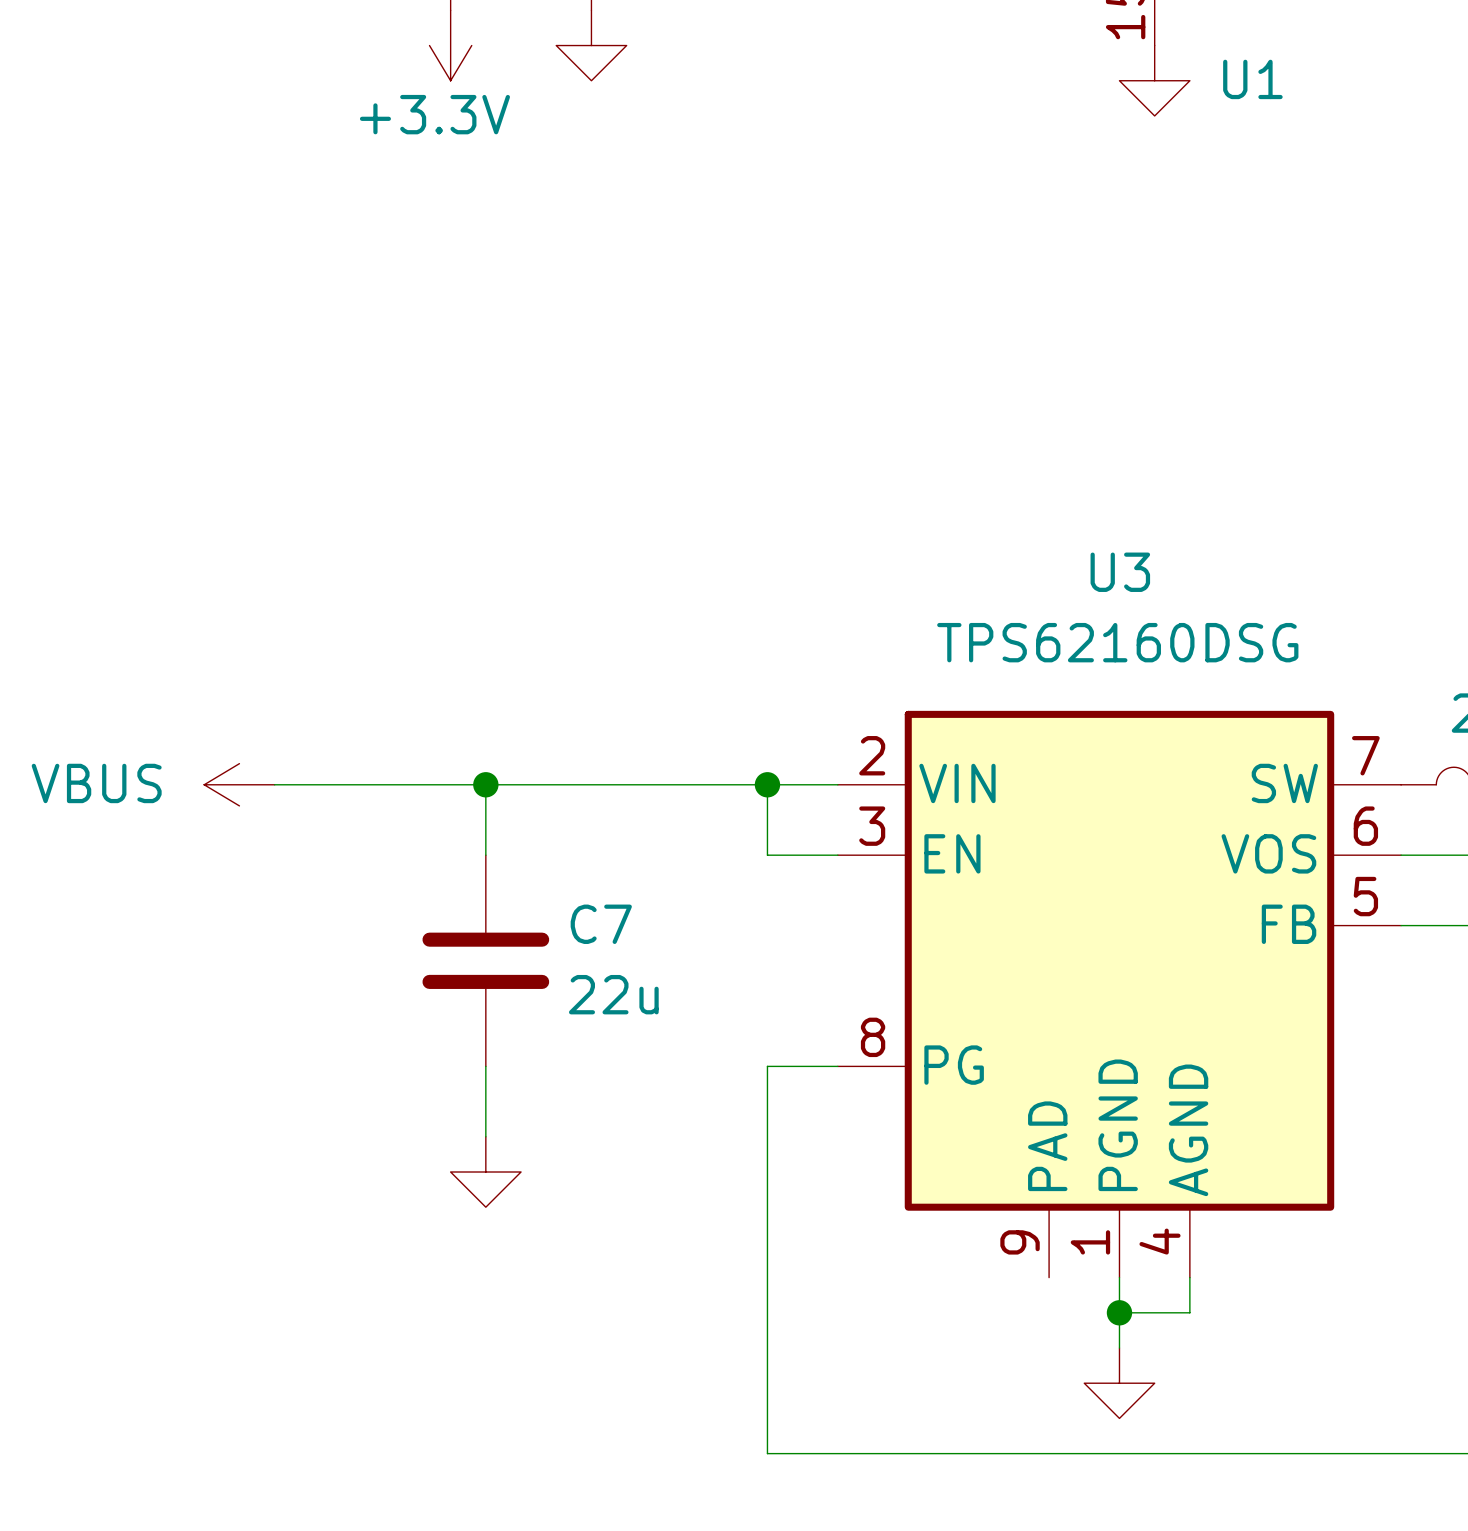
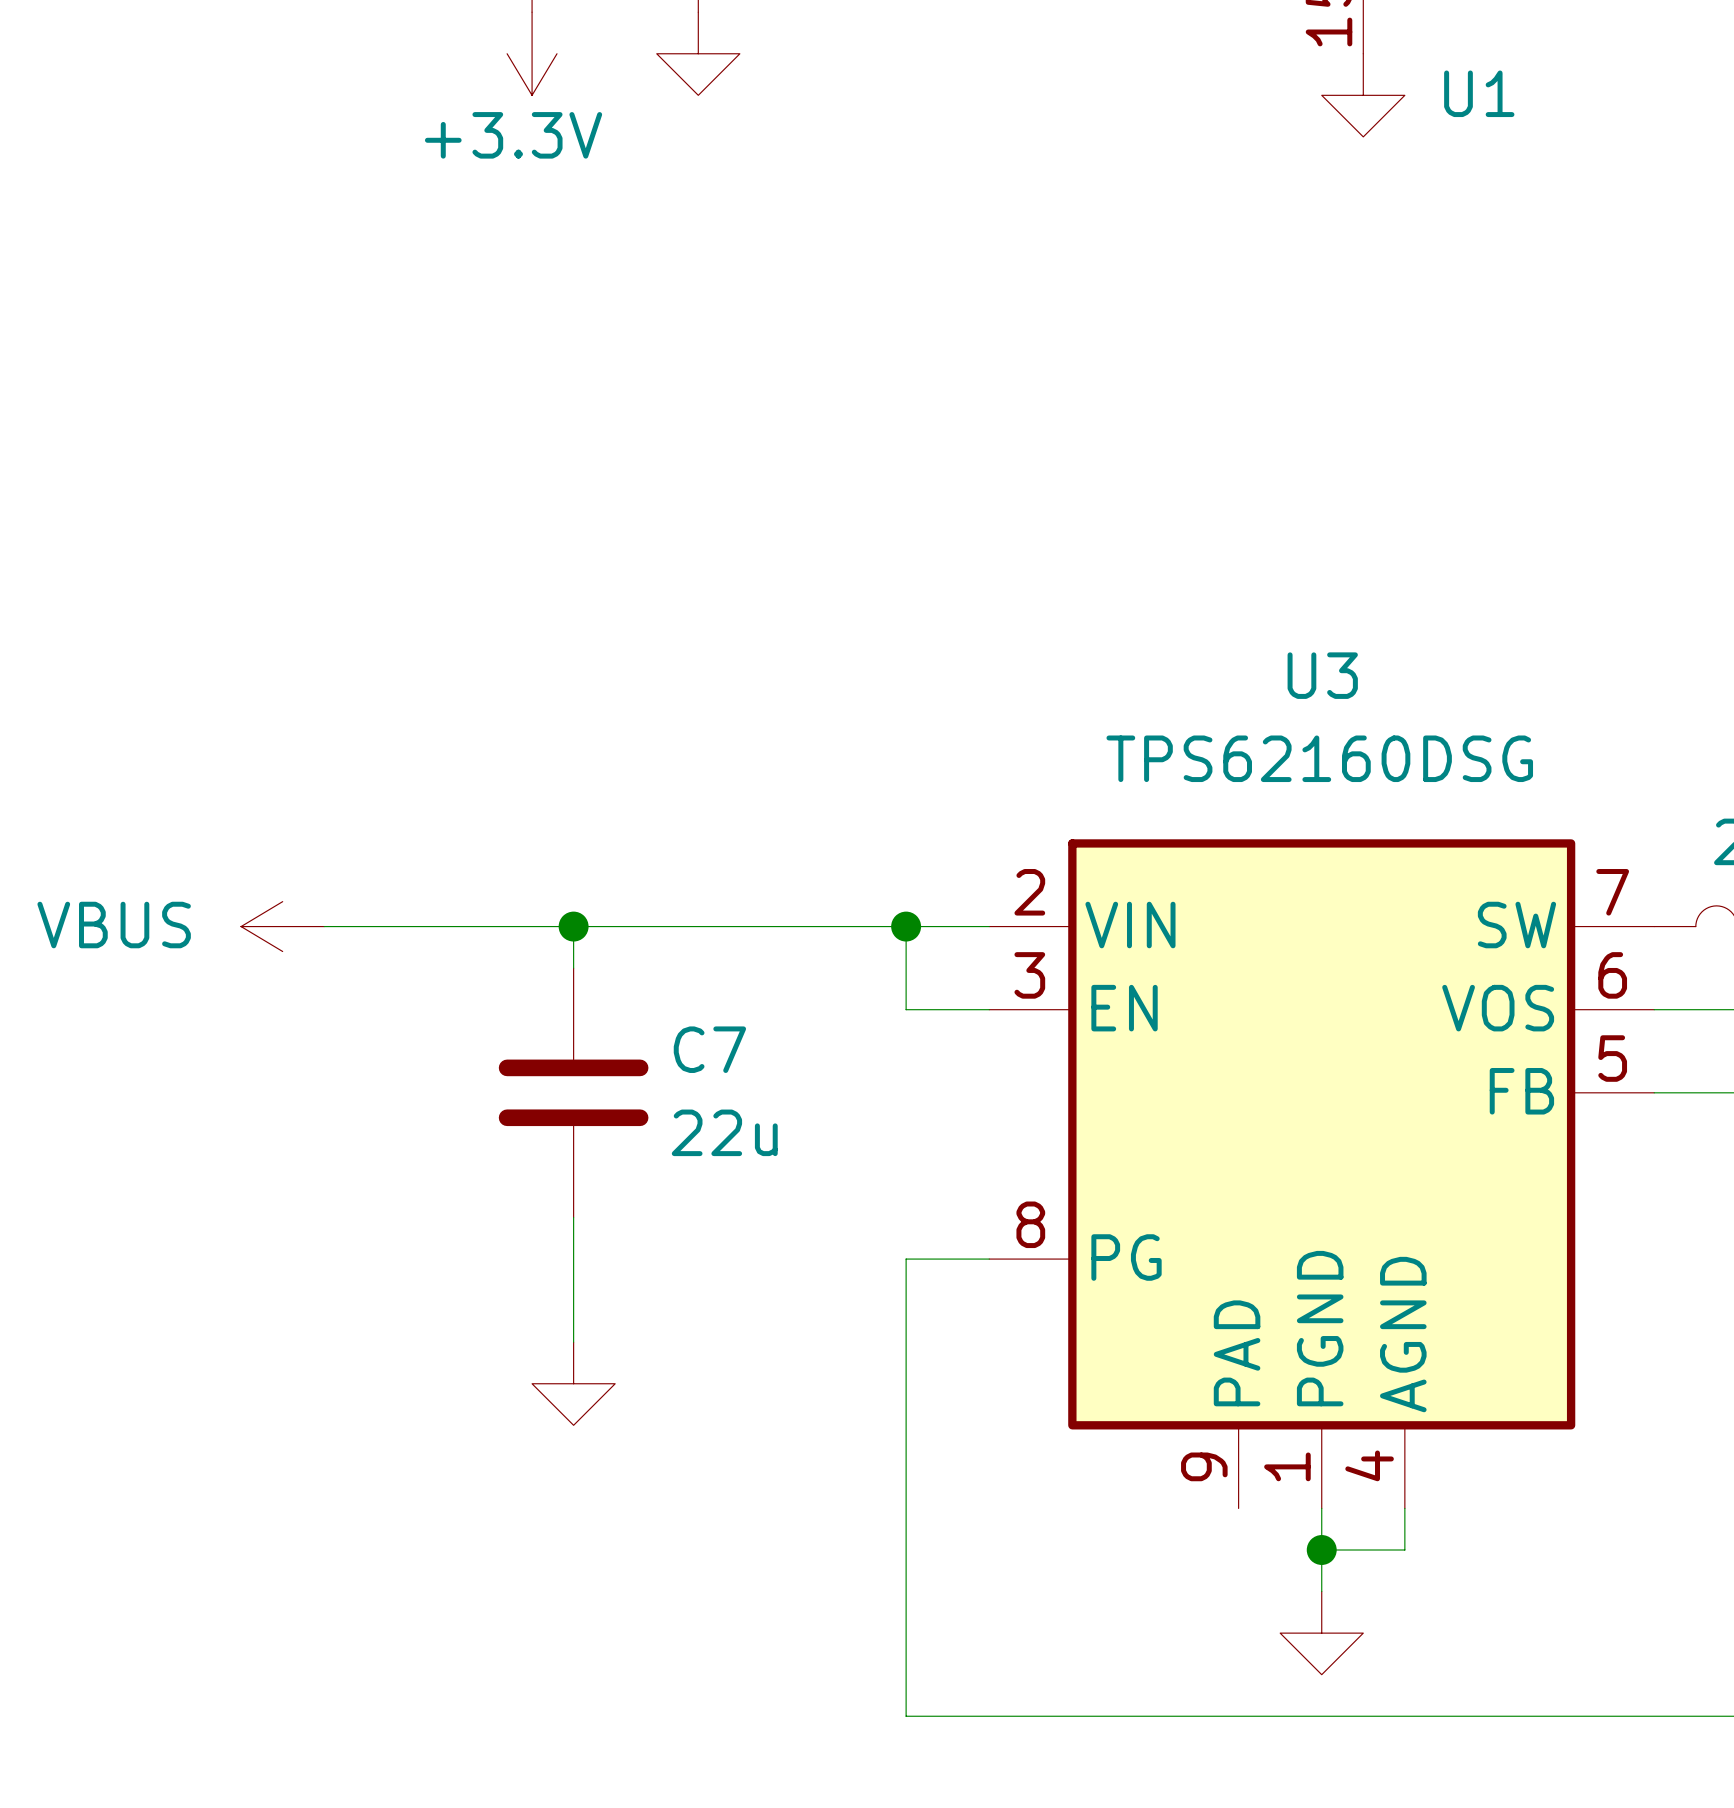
C7 position: (485, 960) -> (573, 1092)

